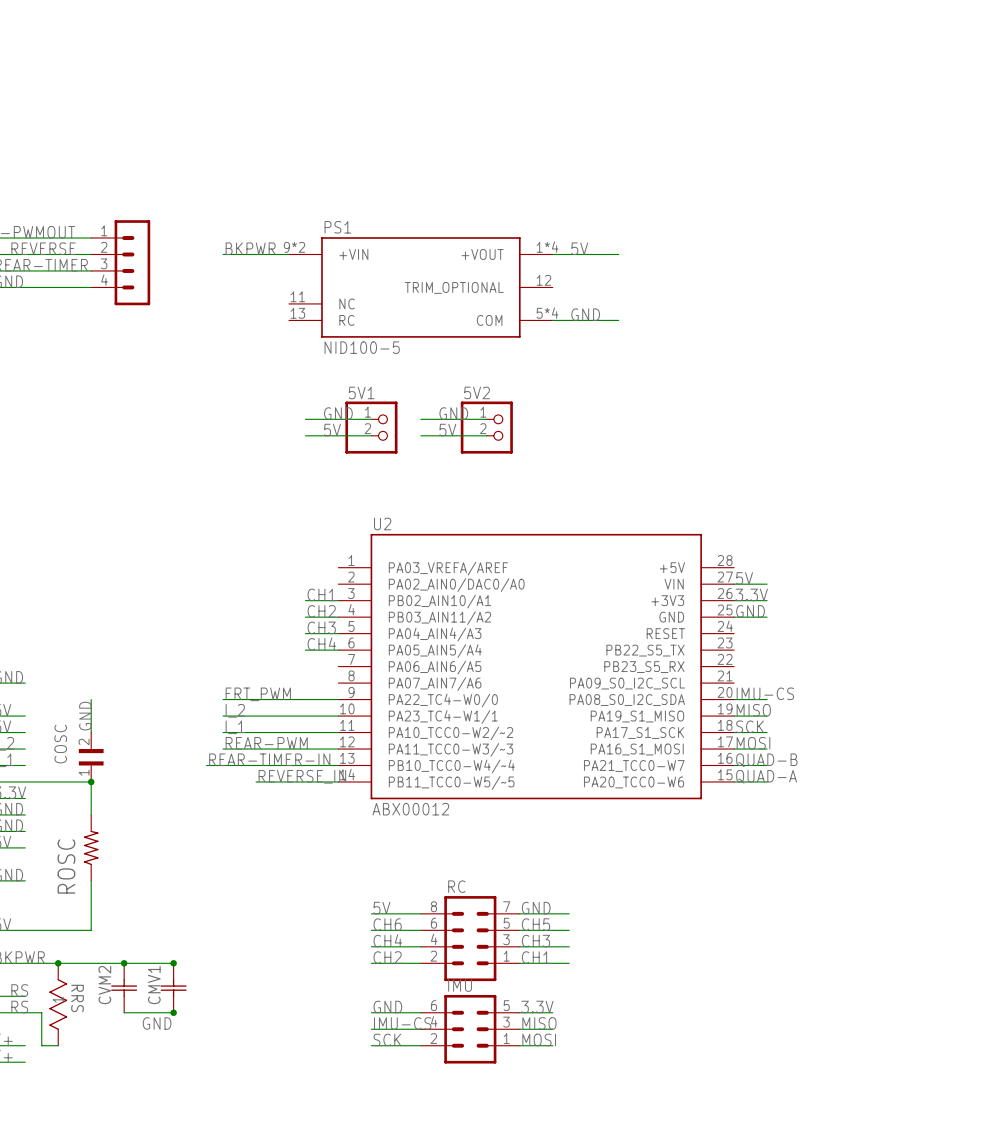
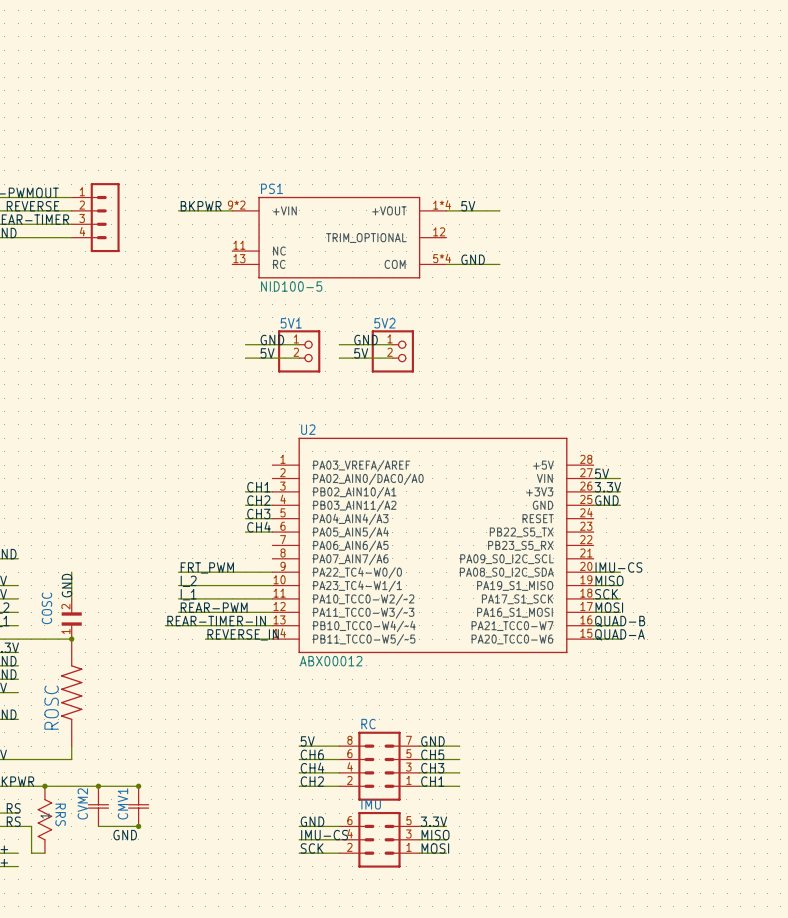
ROSC symbol: [83, 814, 99, 881] -> [61, 639, 83, 747]

